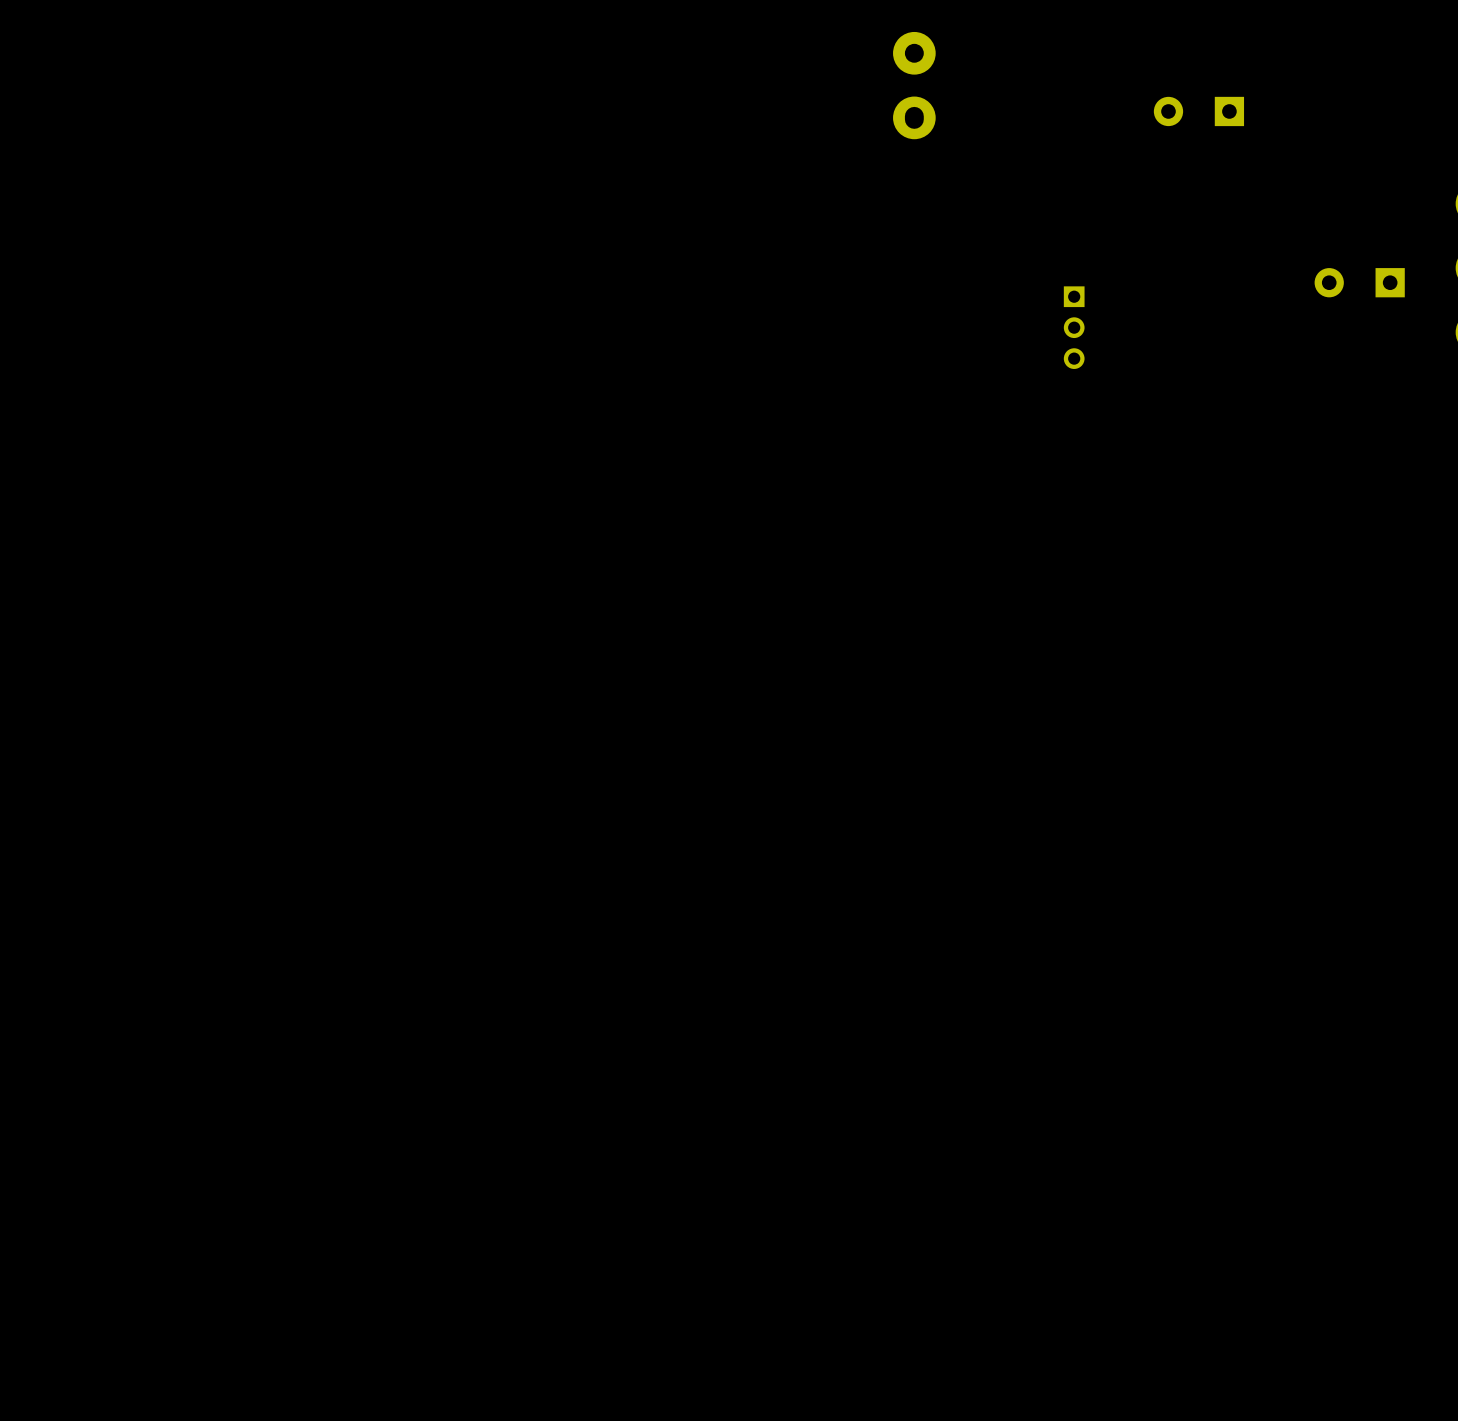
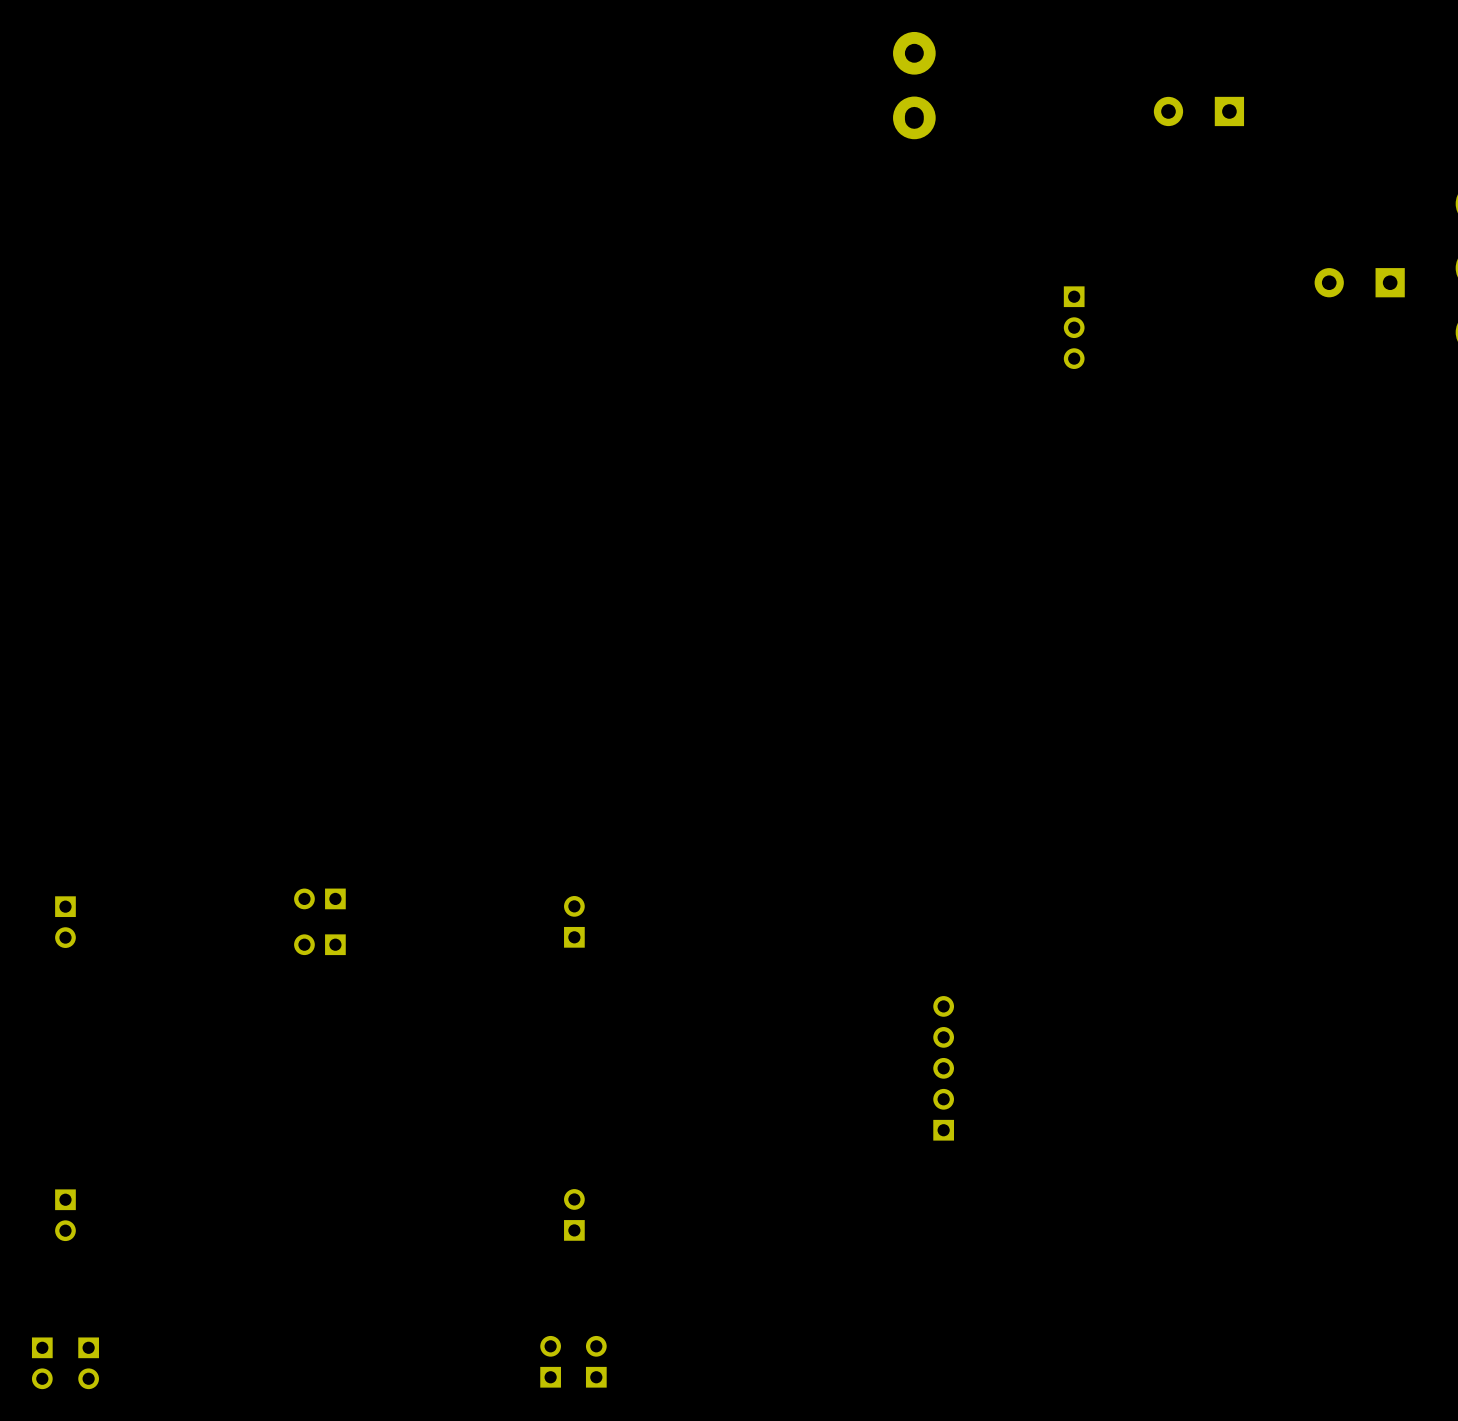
part: none -> (319, 898)
part: none -> (574, 921)
part: none -> (65, 922)
part: none -> (319, 944)
part: none -> (943, 1068)
part: none -> (574, 1214)
part: none -> (65, 1215)
part: none -> (550, 1361)
part: none -> (596, 1361)
part: none -> (42, 1363)
part: none -> (88, 1363)

